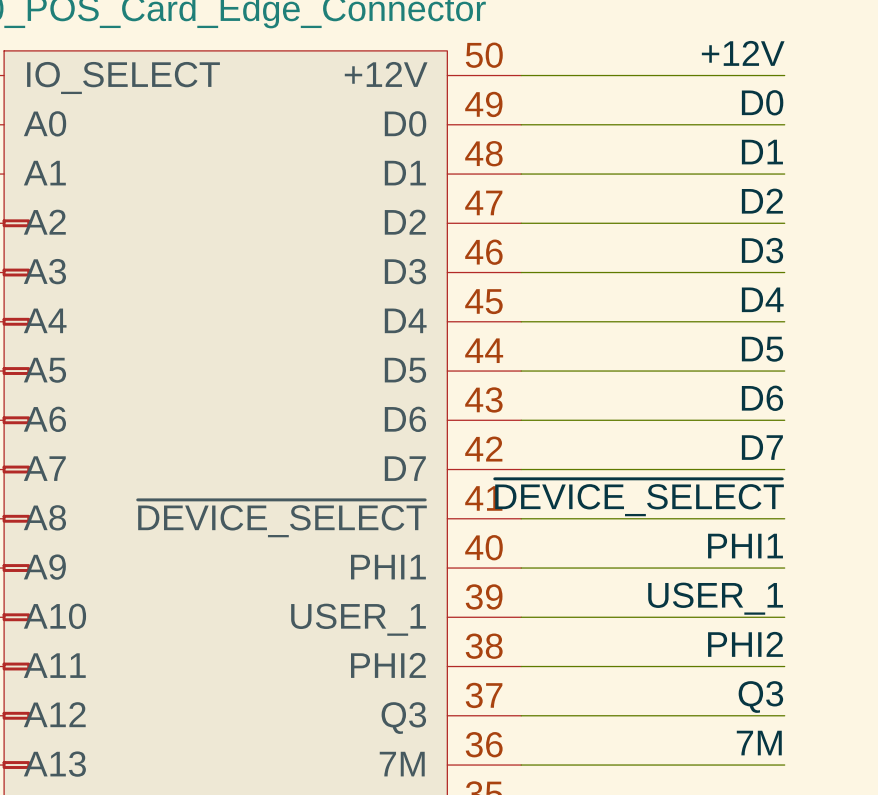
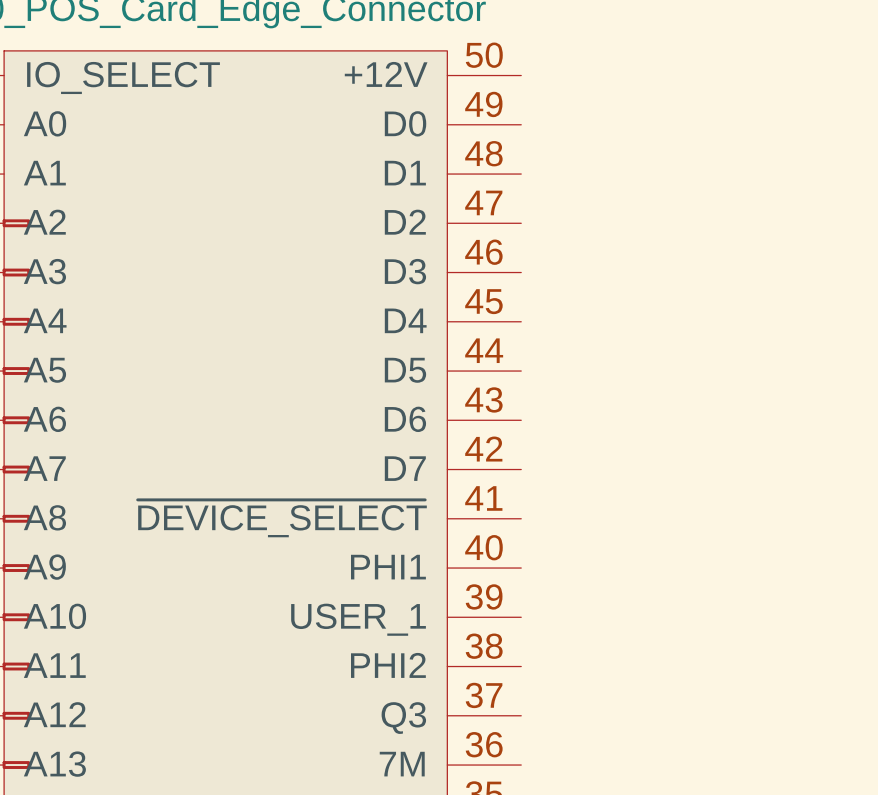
label: +12V (743, 53) -> none
wire: (521, 75) (784, 75) -> none
label: D0 (762, 102) -> none
wire: (521, 124) (784, 124) -> none
label: D1 (762, 152) -> none
wire: (521, 174) (784, 174) -> none
label: D2 (762, 201) -> none
wire: (521, 223) (784, 223) -> none
label: D3 (762, 250) -> none
wire: (521, 272) (784, 272) -> none
label: D4 (762, 299) -> none
wire: (521, 321) (784, 321) -> none
label: D5 (762, 349) -> none
wire: (521, 371) (784, 371) -> none
label: D6 (762, 398) -> none
wire: (521, 420) (784, 420) -> none
label: D7 (762, 447) -> none
wire: (521, 469) (784, 469) -> none
label: ~{DEVICE_SELECT} (639, 497) -> none
wire: (521, 518) (784, 518) -> none
label: PHI1 (745, 546) -> none
wire: (521, 568) (784, 568) -> none
label: USER_1 (715, 598) -> none
wire: (521, 617) (784, 617) -> none
label: PHI2 (745, 644) -> none
wire: (521, 666) (784, 666) -> none
label: Q3 (760, 696) -> none
wire: (521, 715) (784, 715) -> none
label: 7M (759, 743) -> none
wire: (521, 765) (784, 765) -> none

